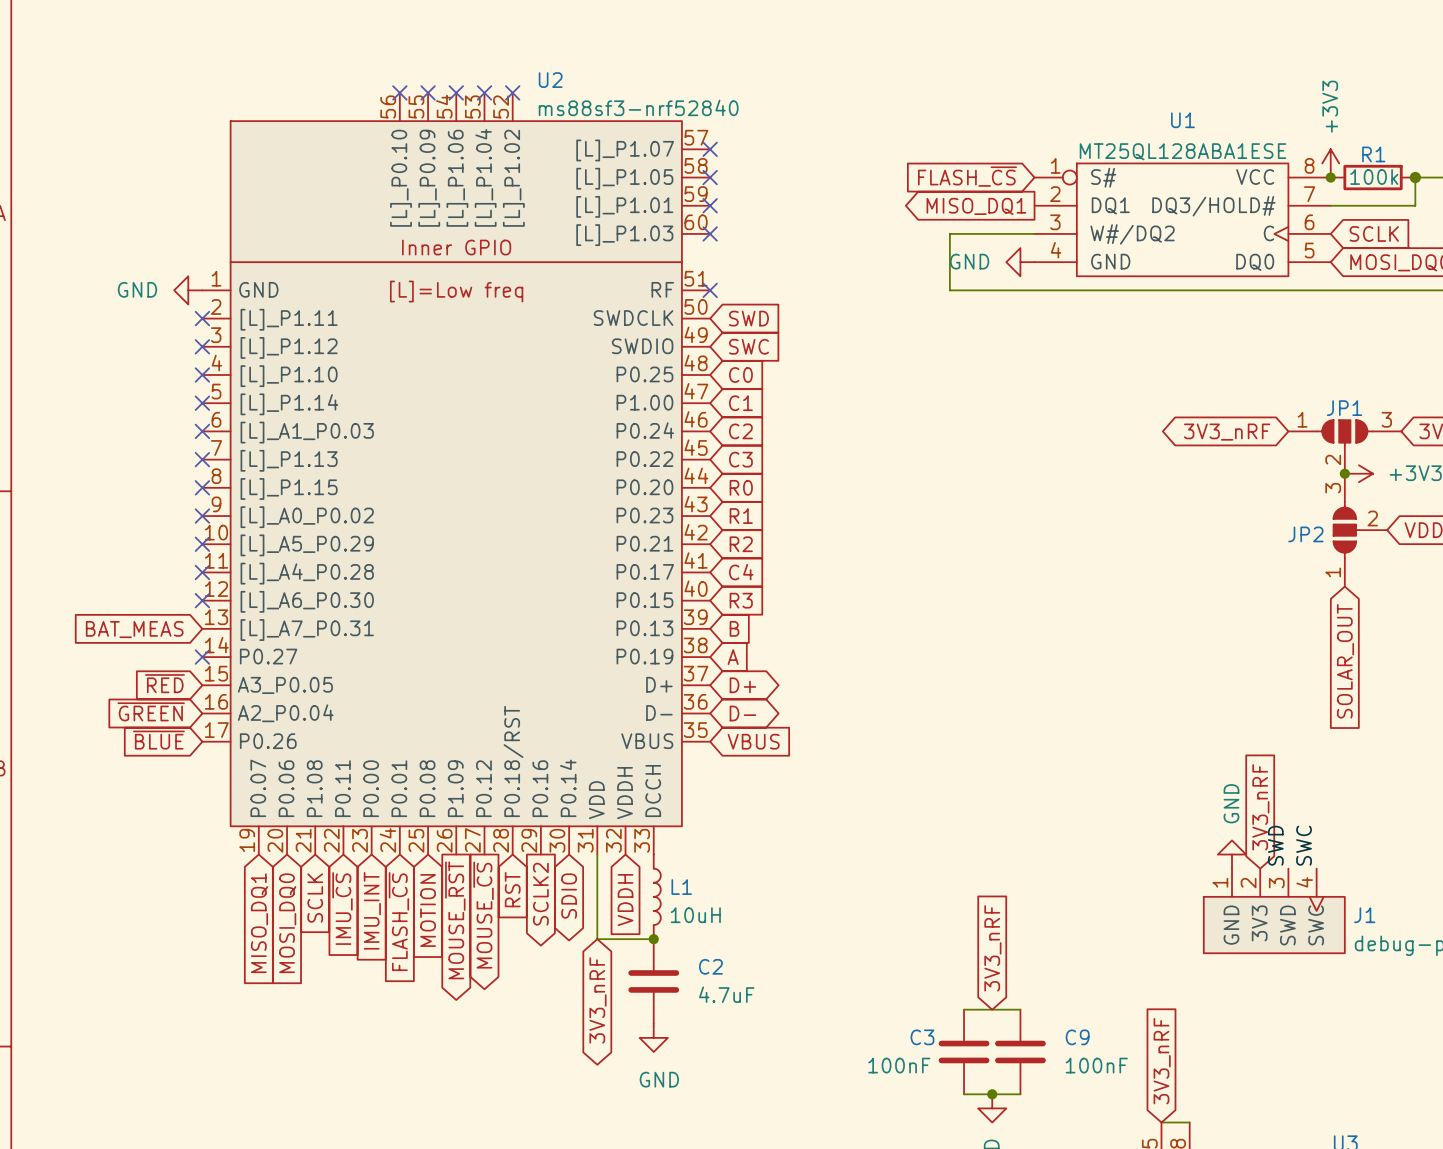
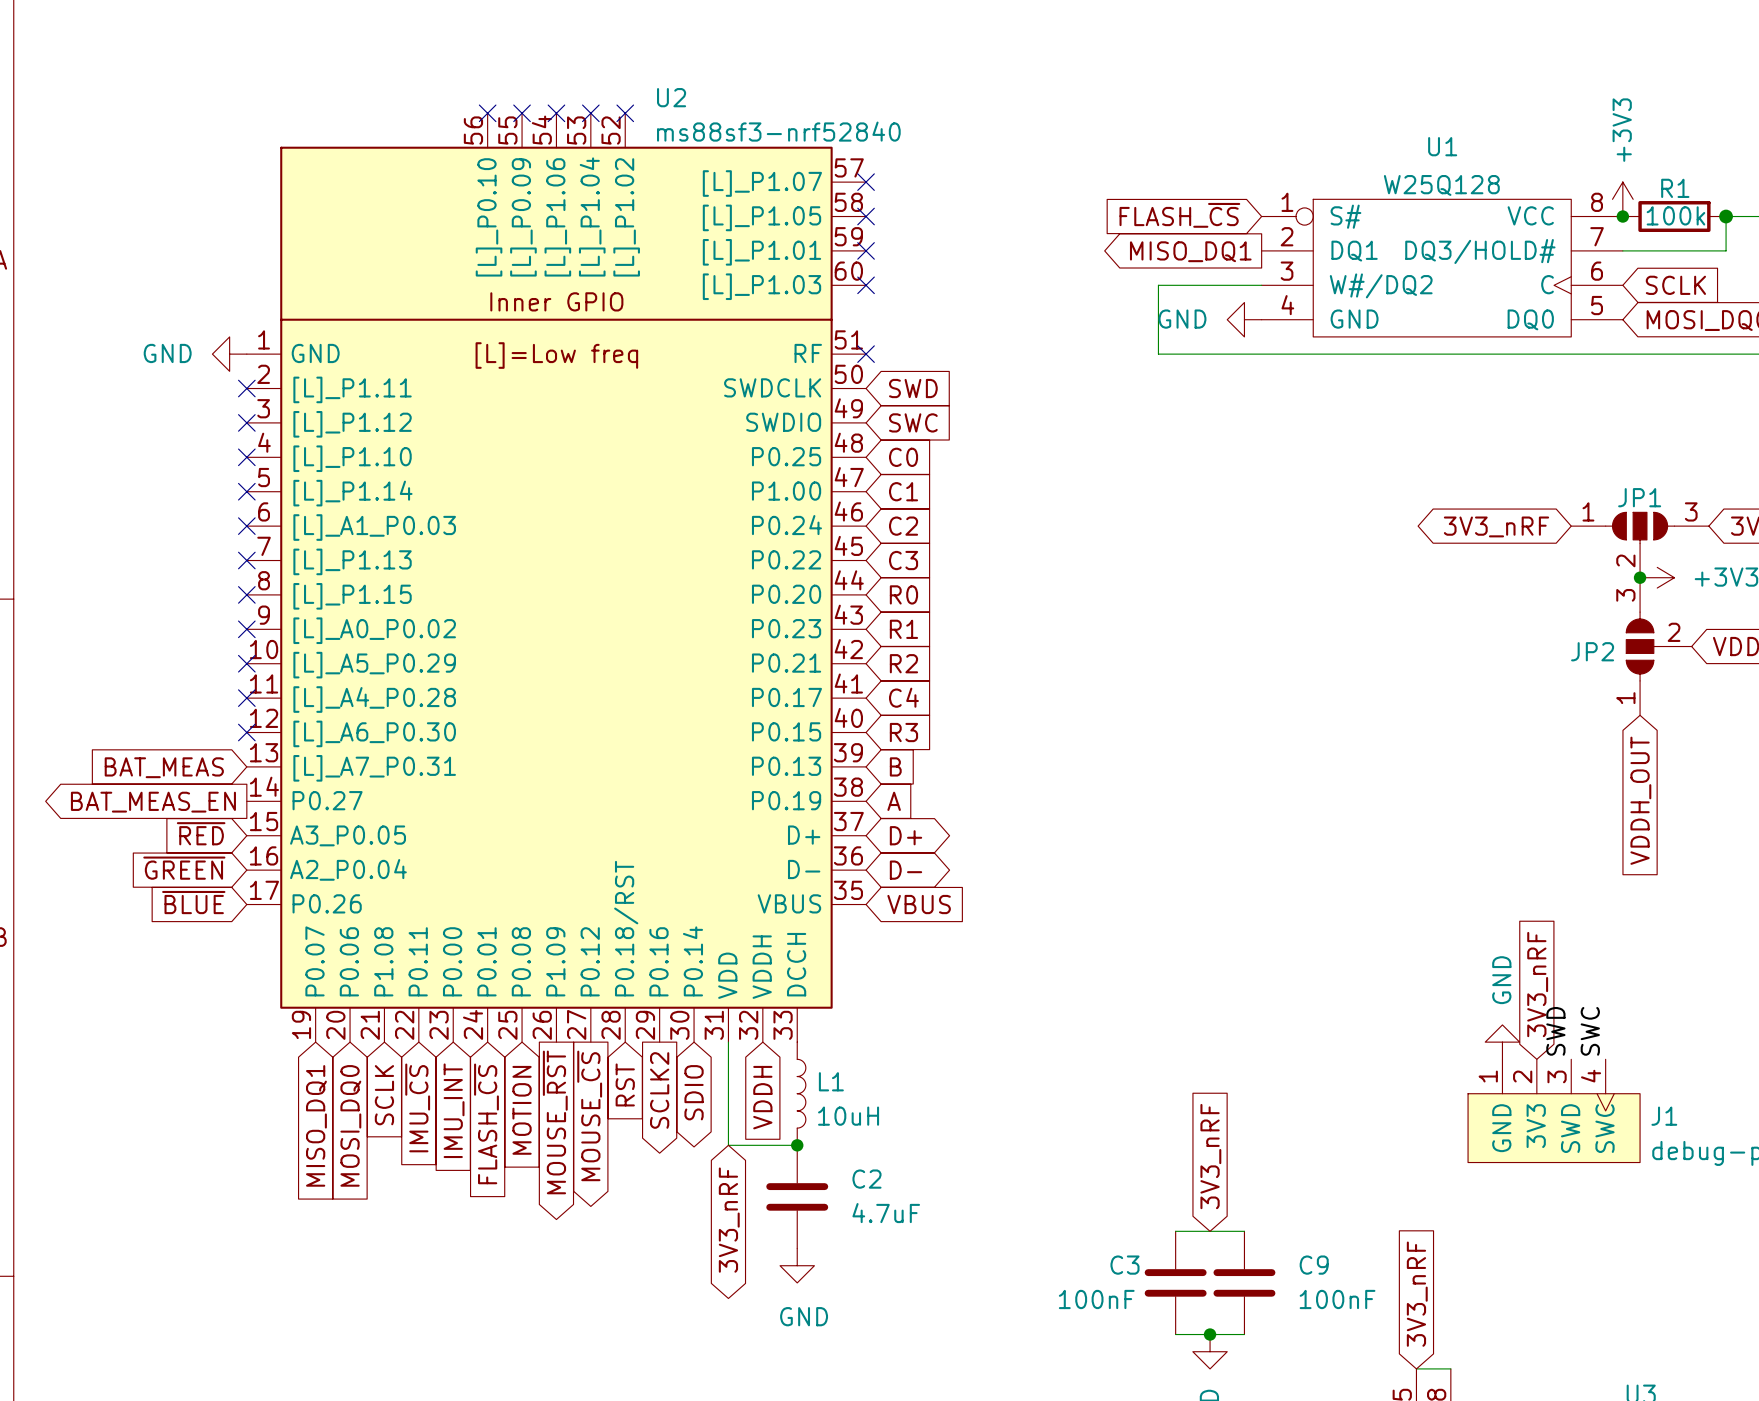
U1 value: MT25QL128ABA1ESE (1182, 151) -> W25Q128 (1441, 185)
global label: none -> BAT_MEAS_EN (153, 802)
no-connect mark: (202, 657) -> none
global label: SOLAR_OUT (1345, 661) -> VDDH_OUT (1640, 800)

